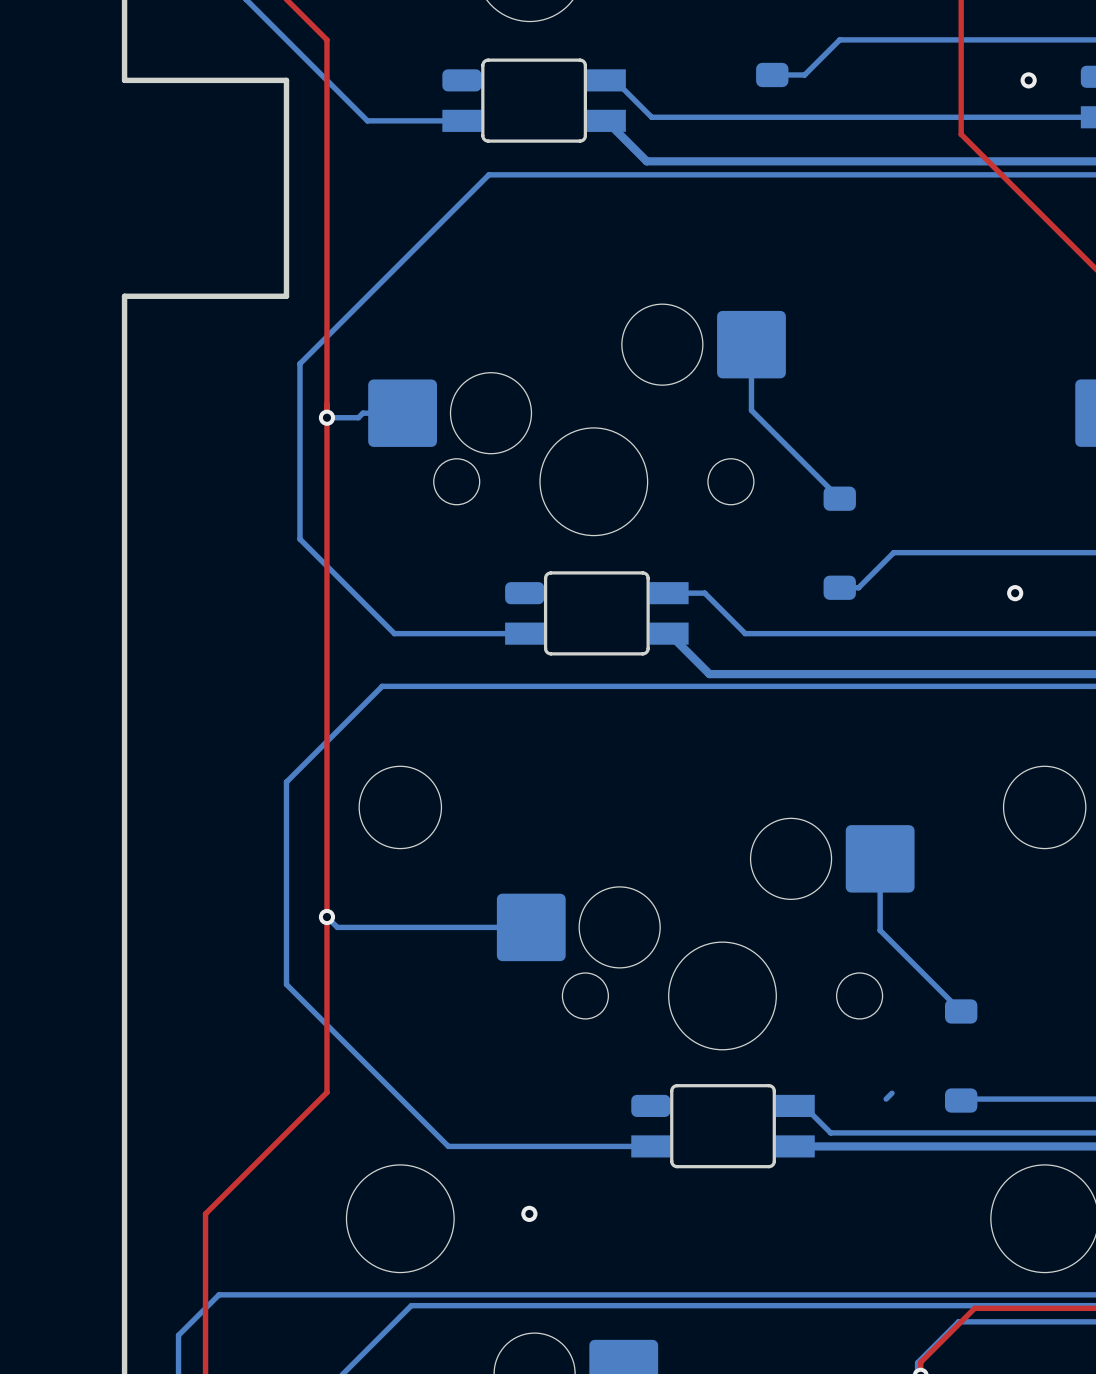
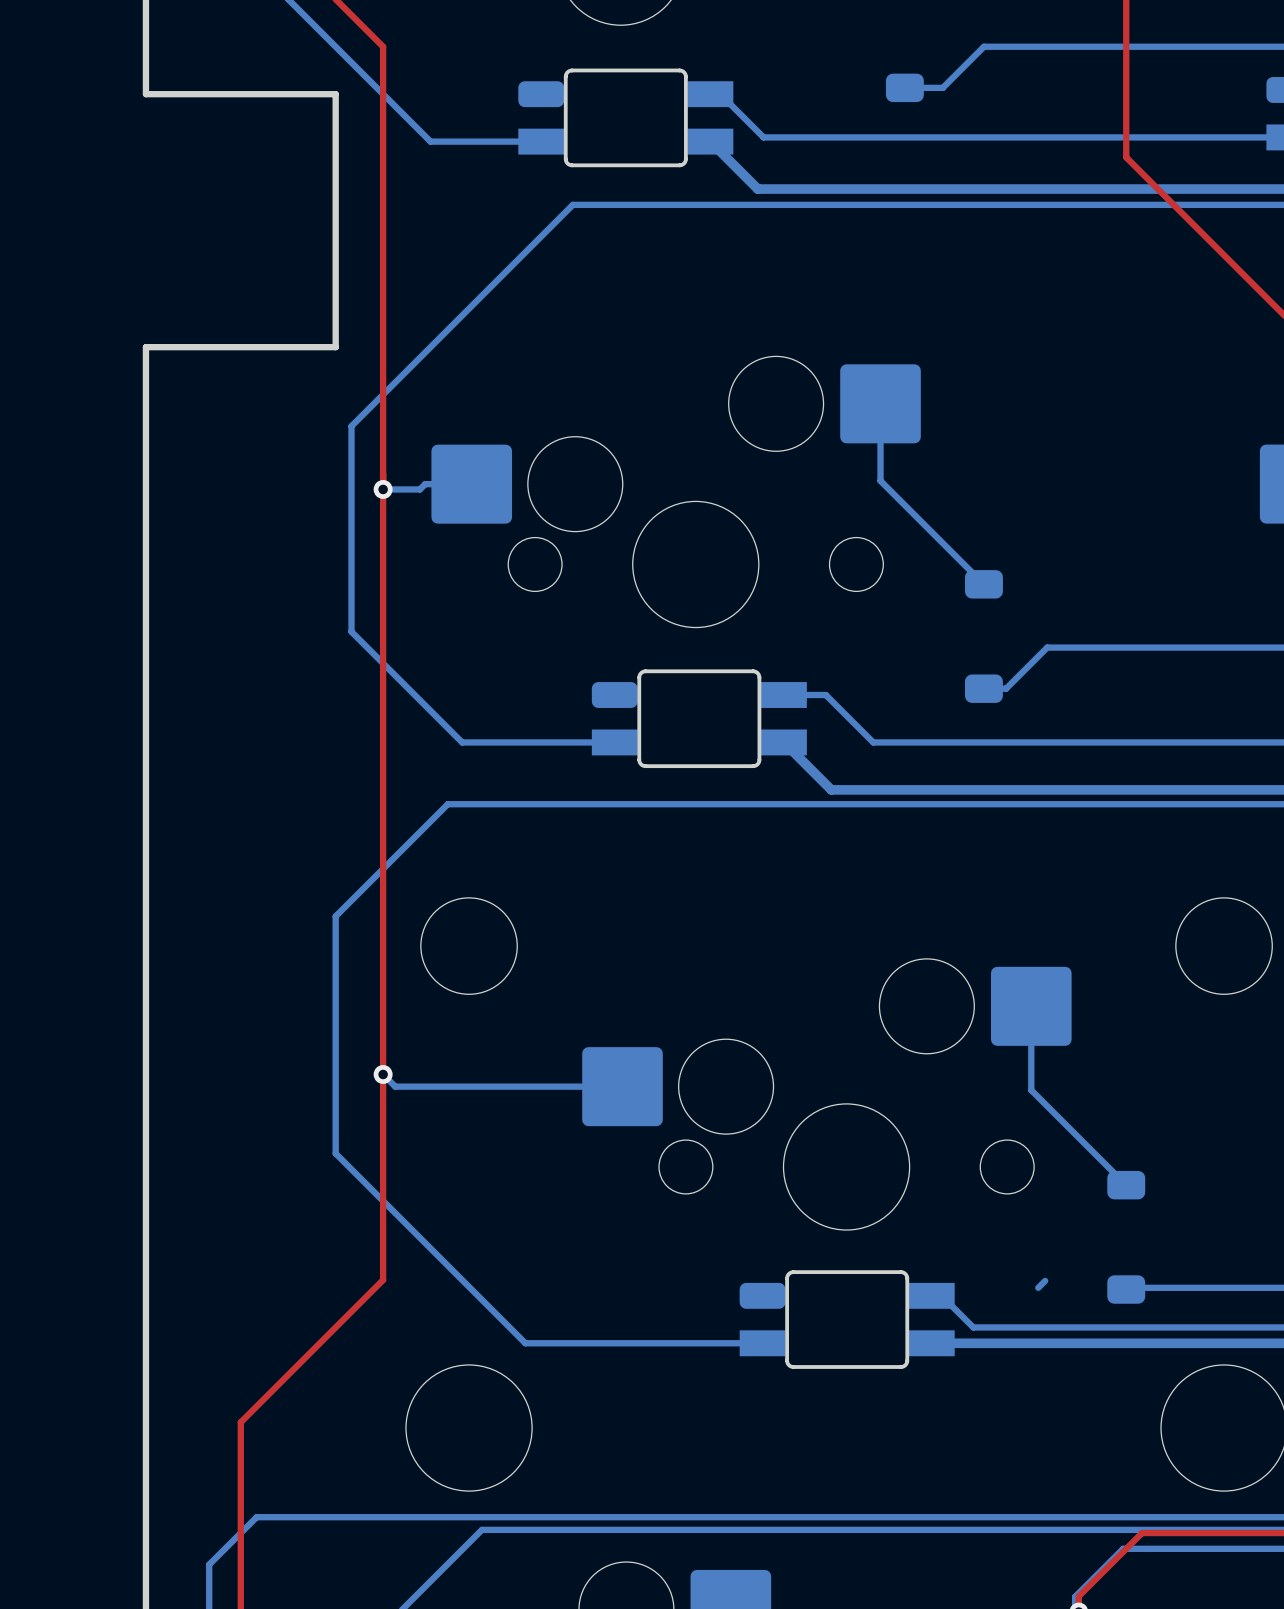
via: (1028, 80) -> none
via: (1015, 593) -> none
via: (529, 1213) -> none

